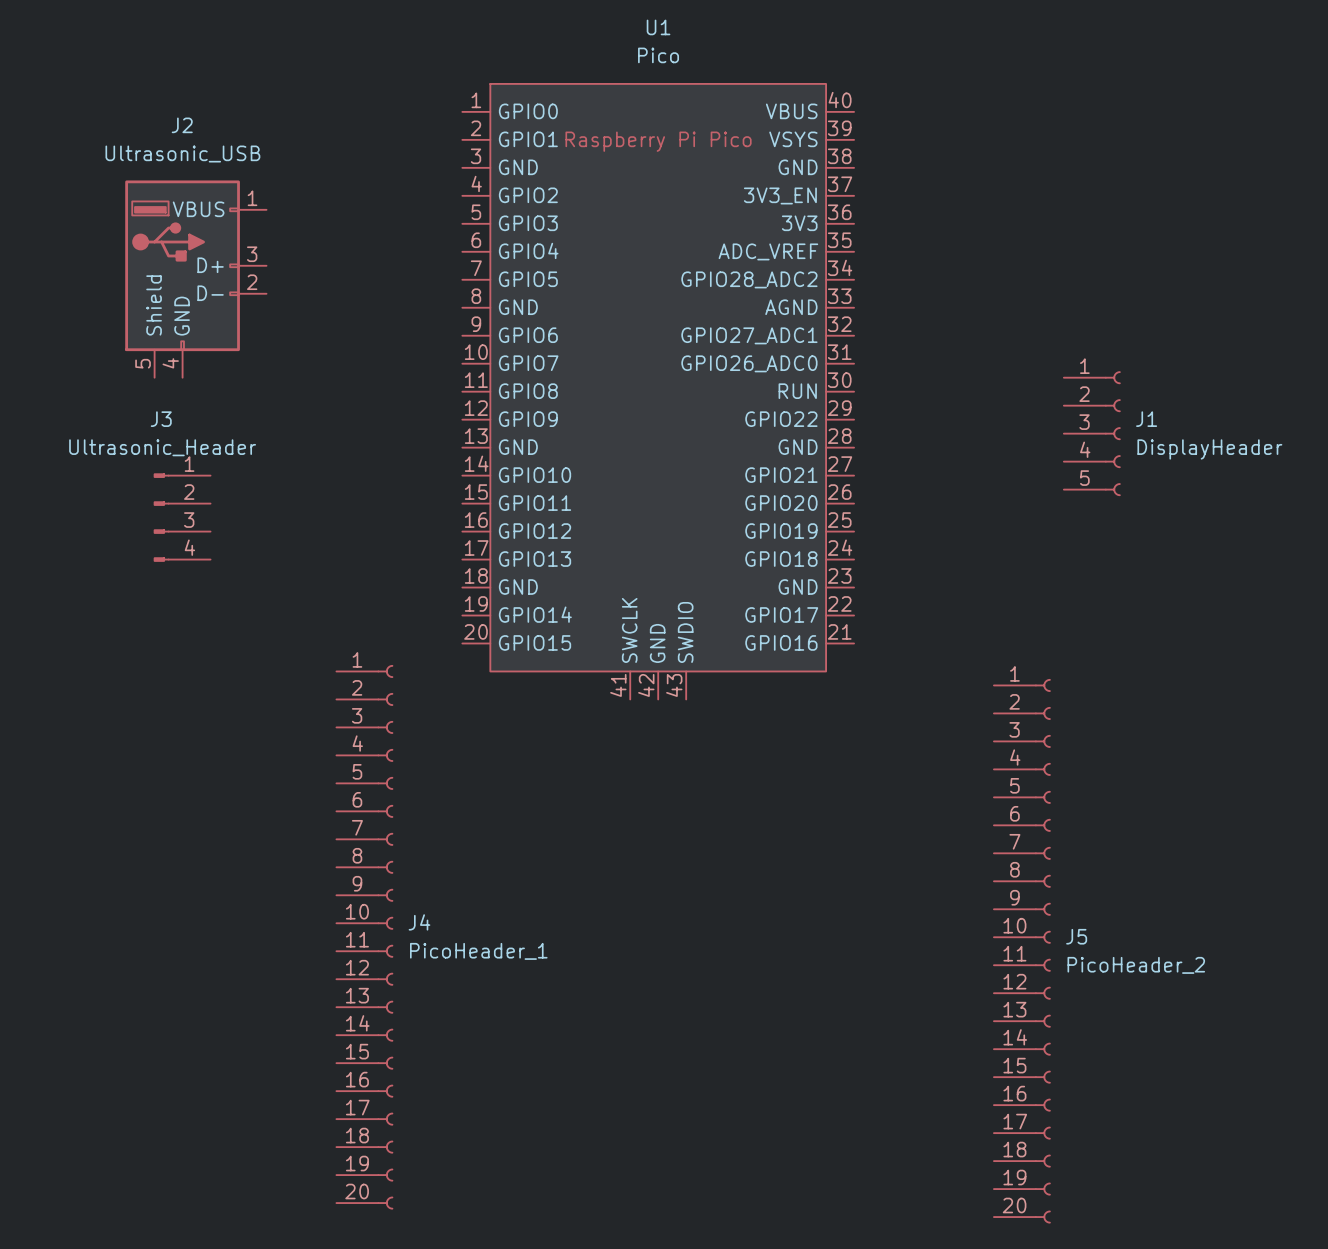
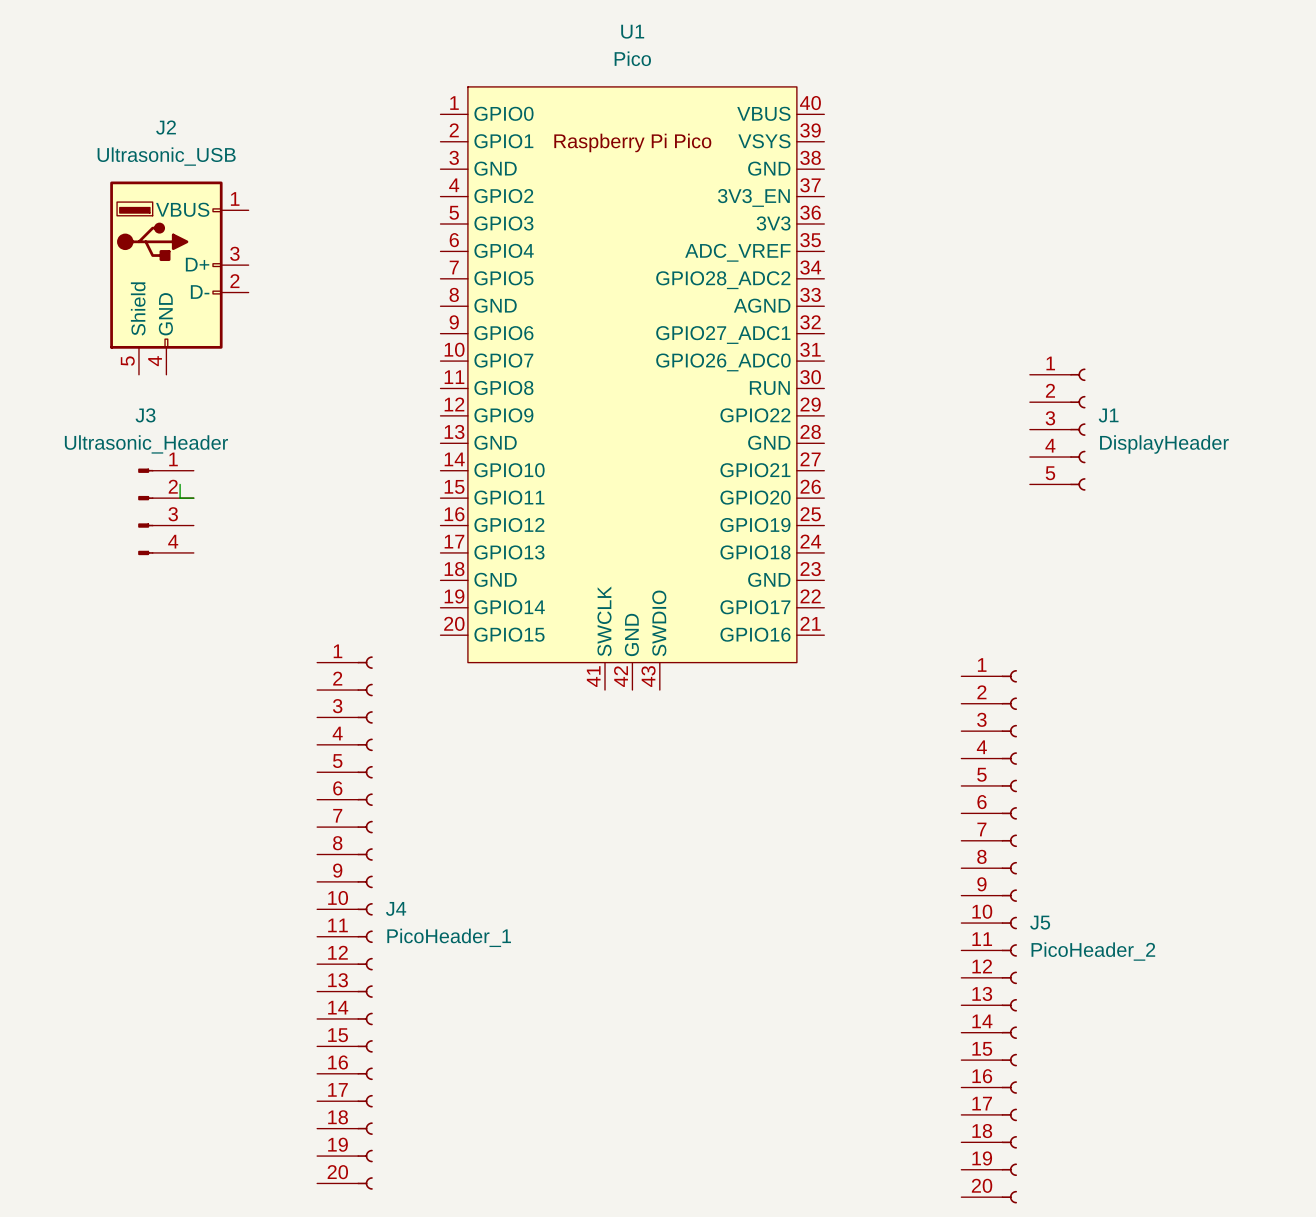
wire: none -> (180, 484) (180, 498) (193, 498)

